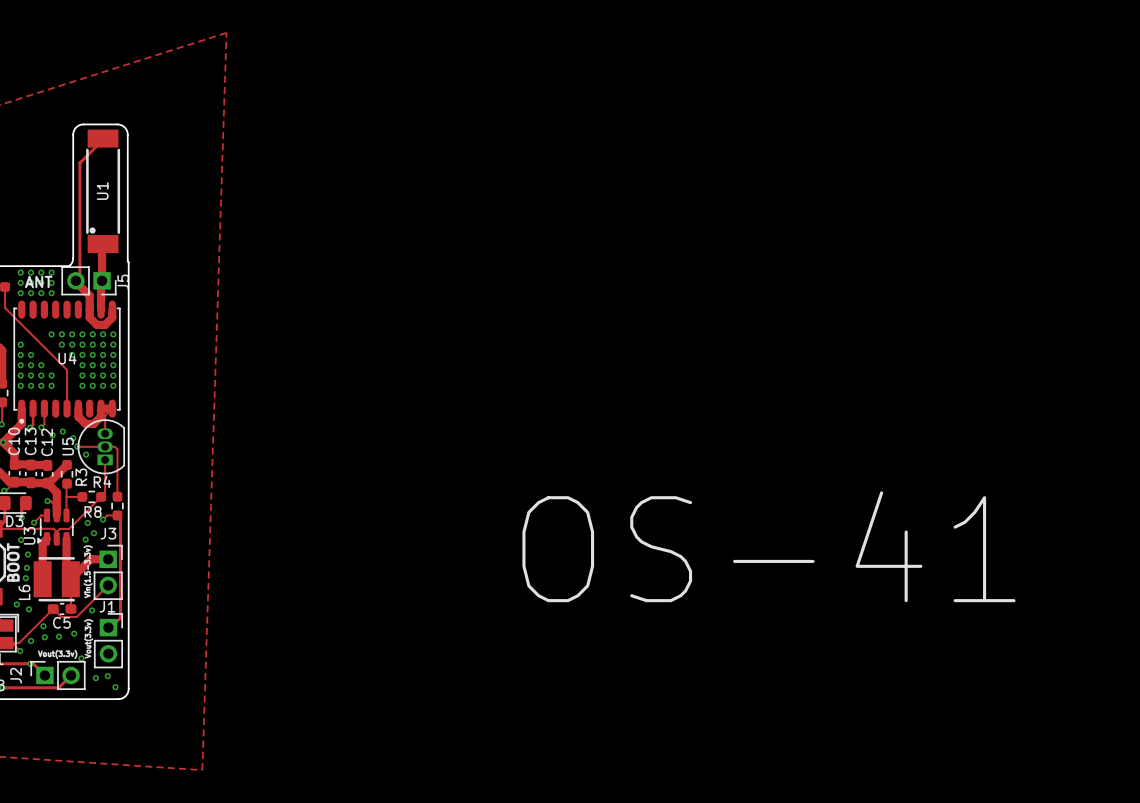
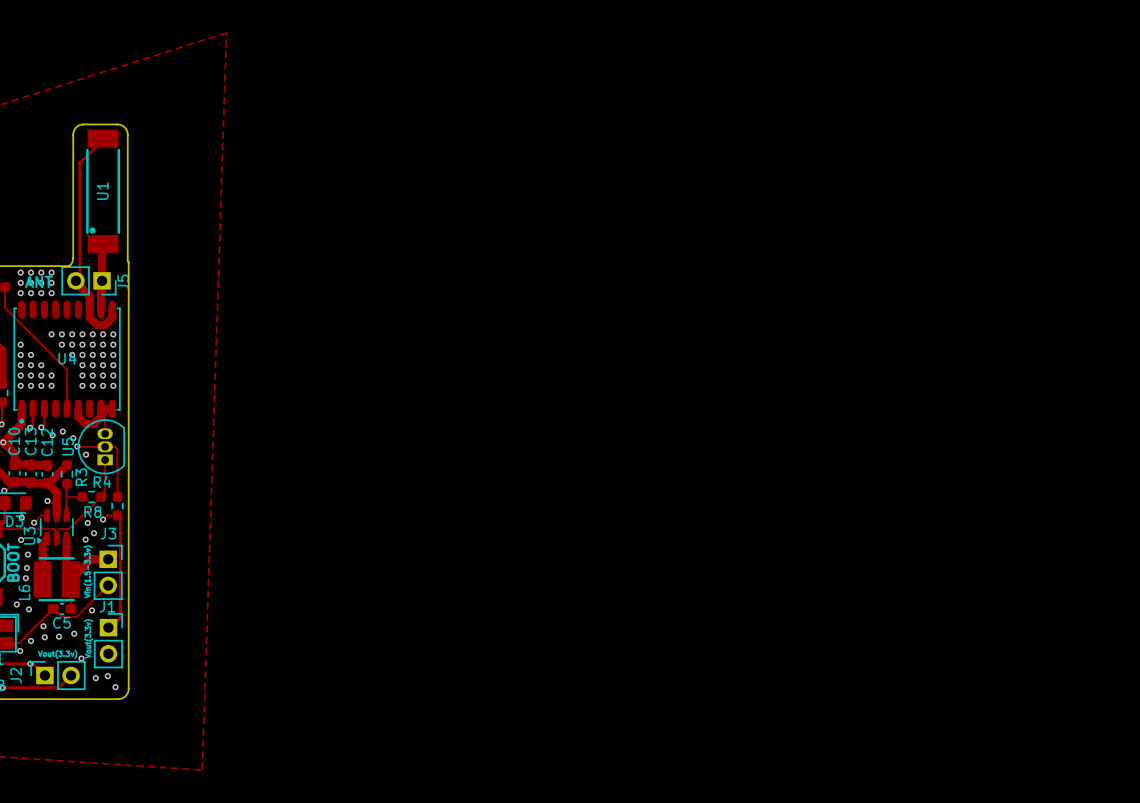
text: OS-41 (768, 546) -> none

